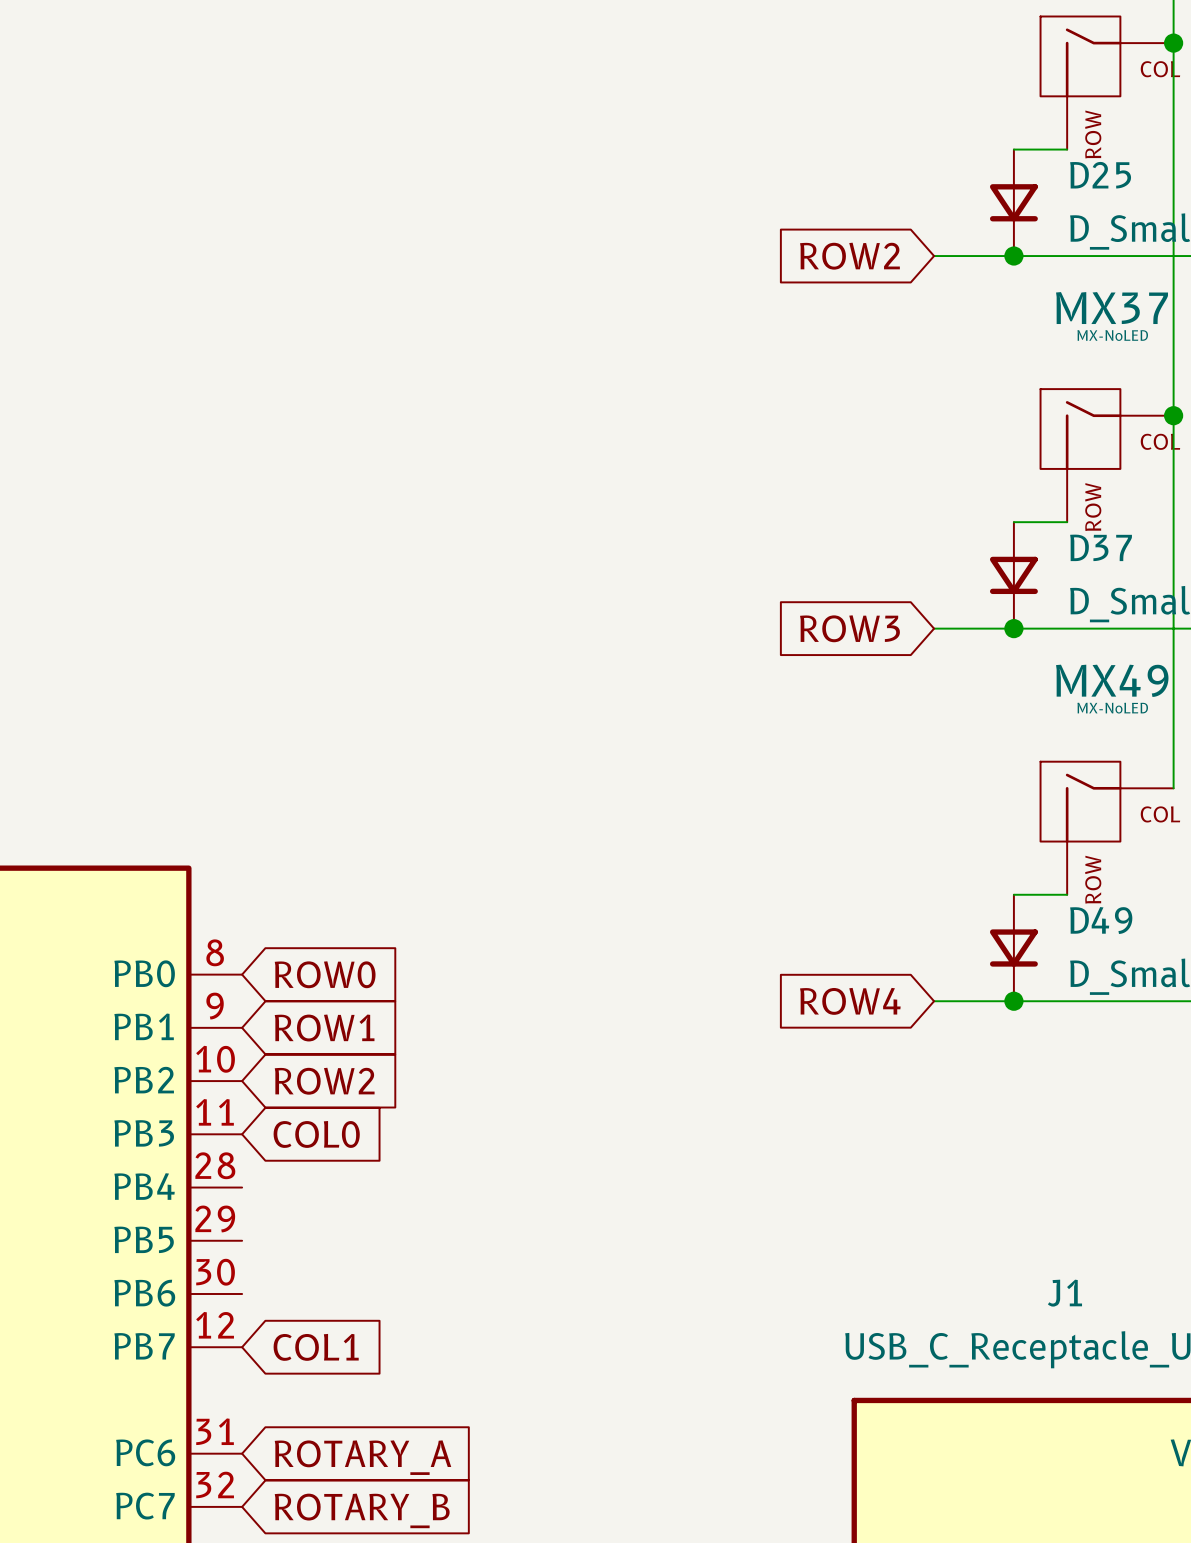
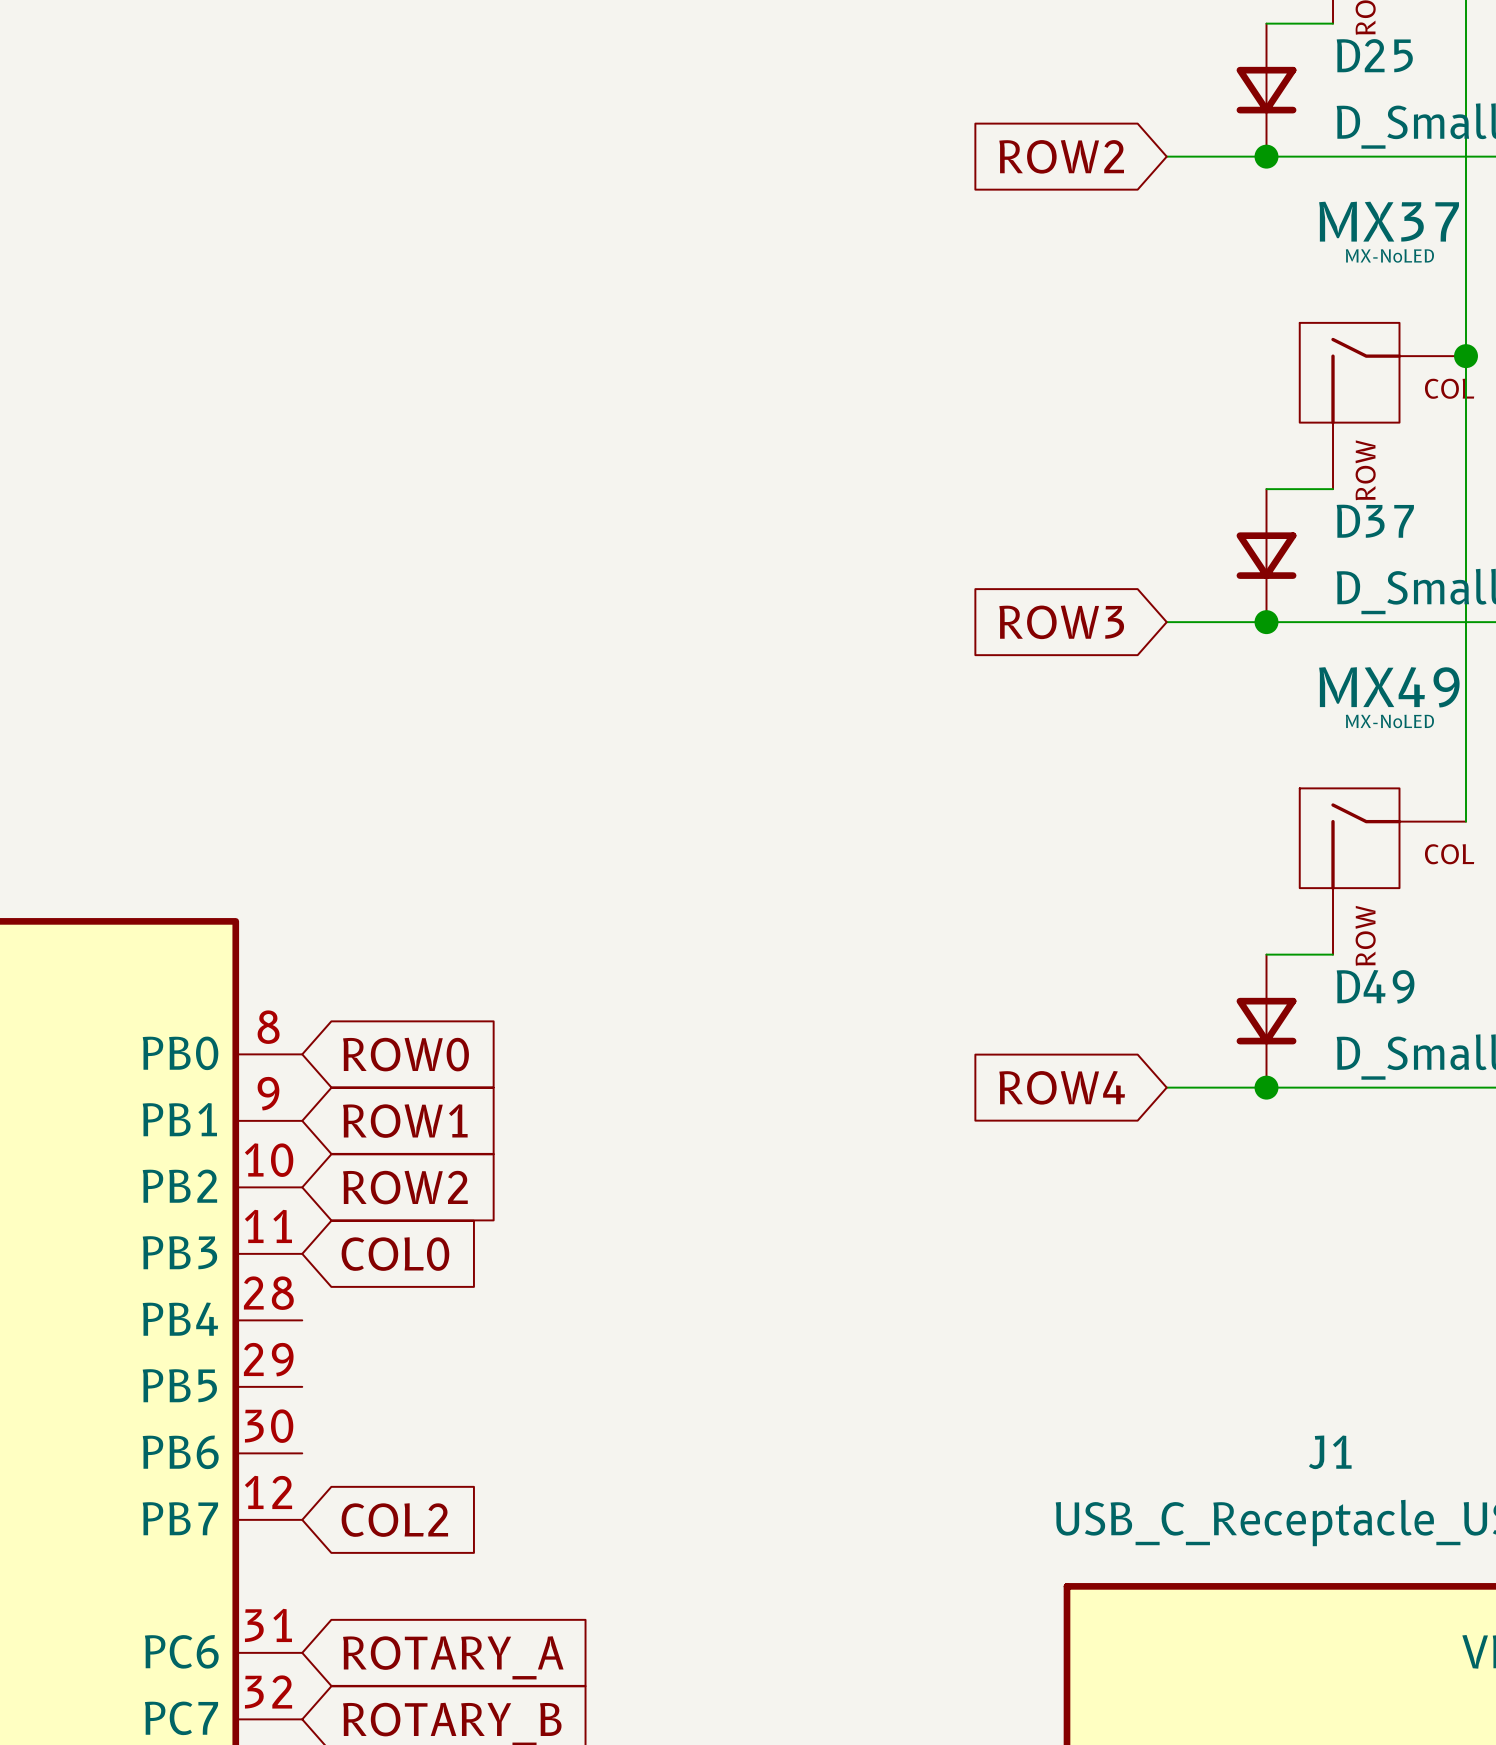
global label: COL1 (316, 1347) -> COL2 (394, 1520)

